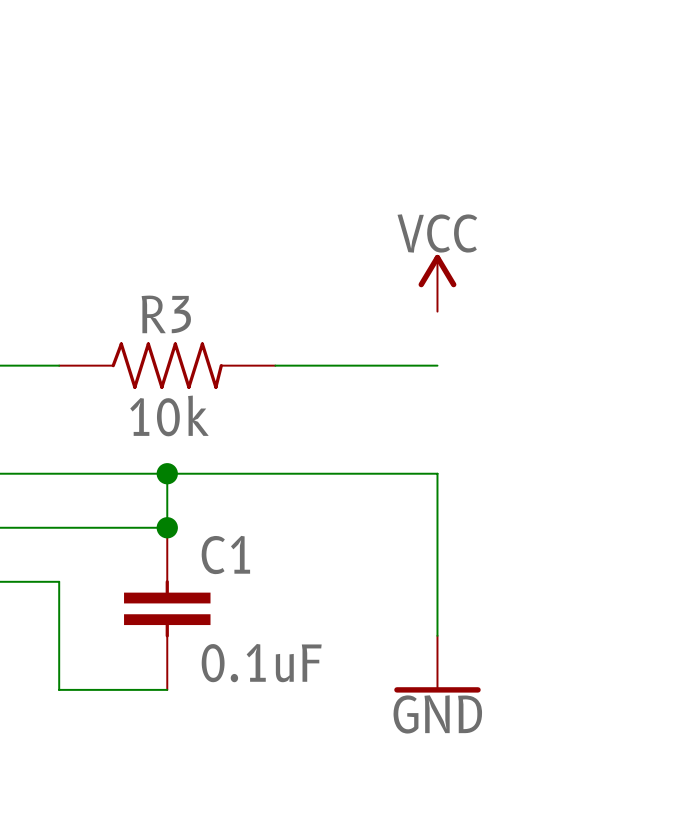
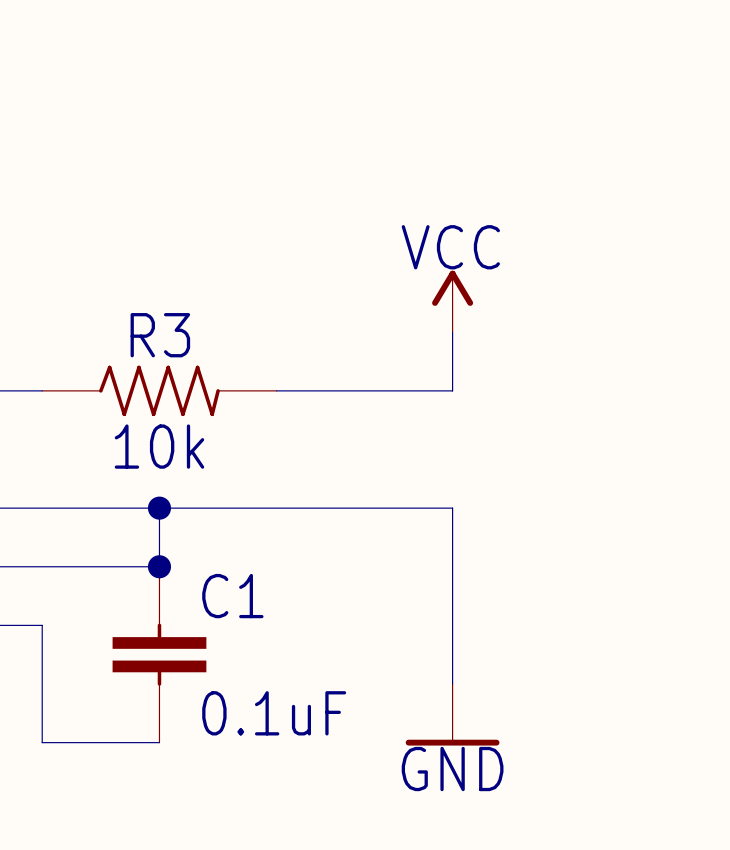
wire: none -> (452, 332) (452, 390)

